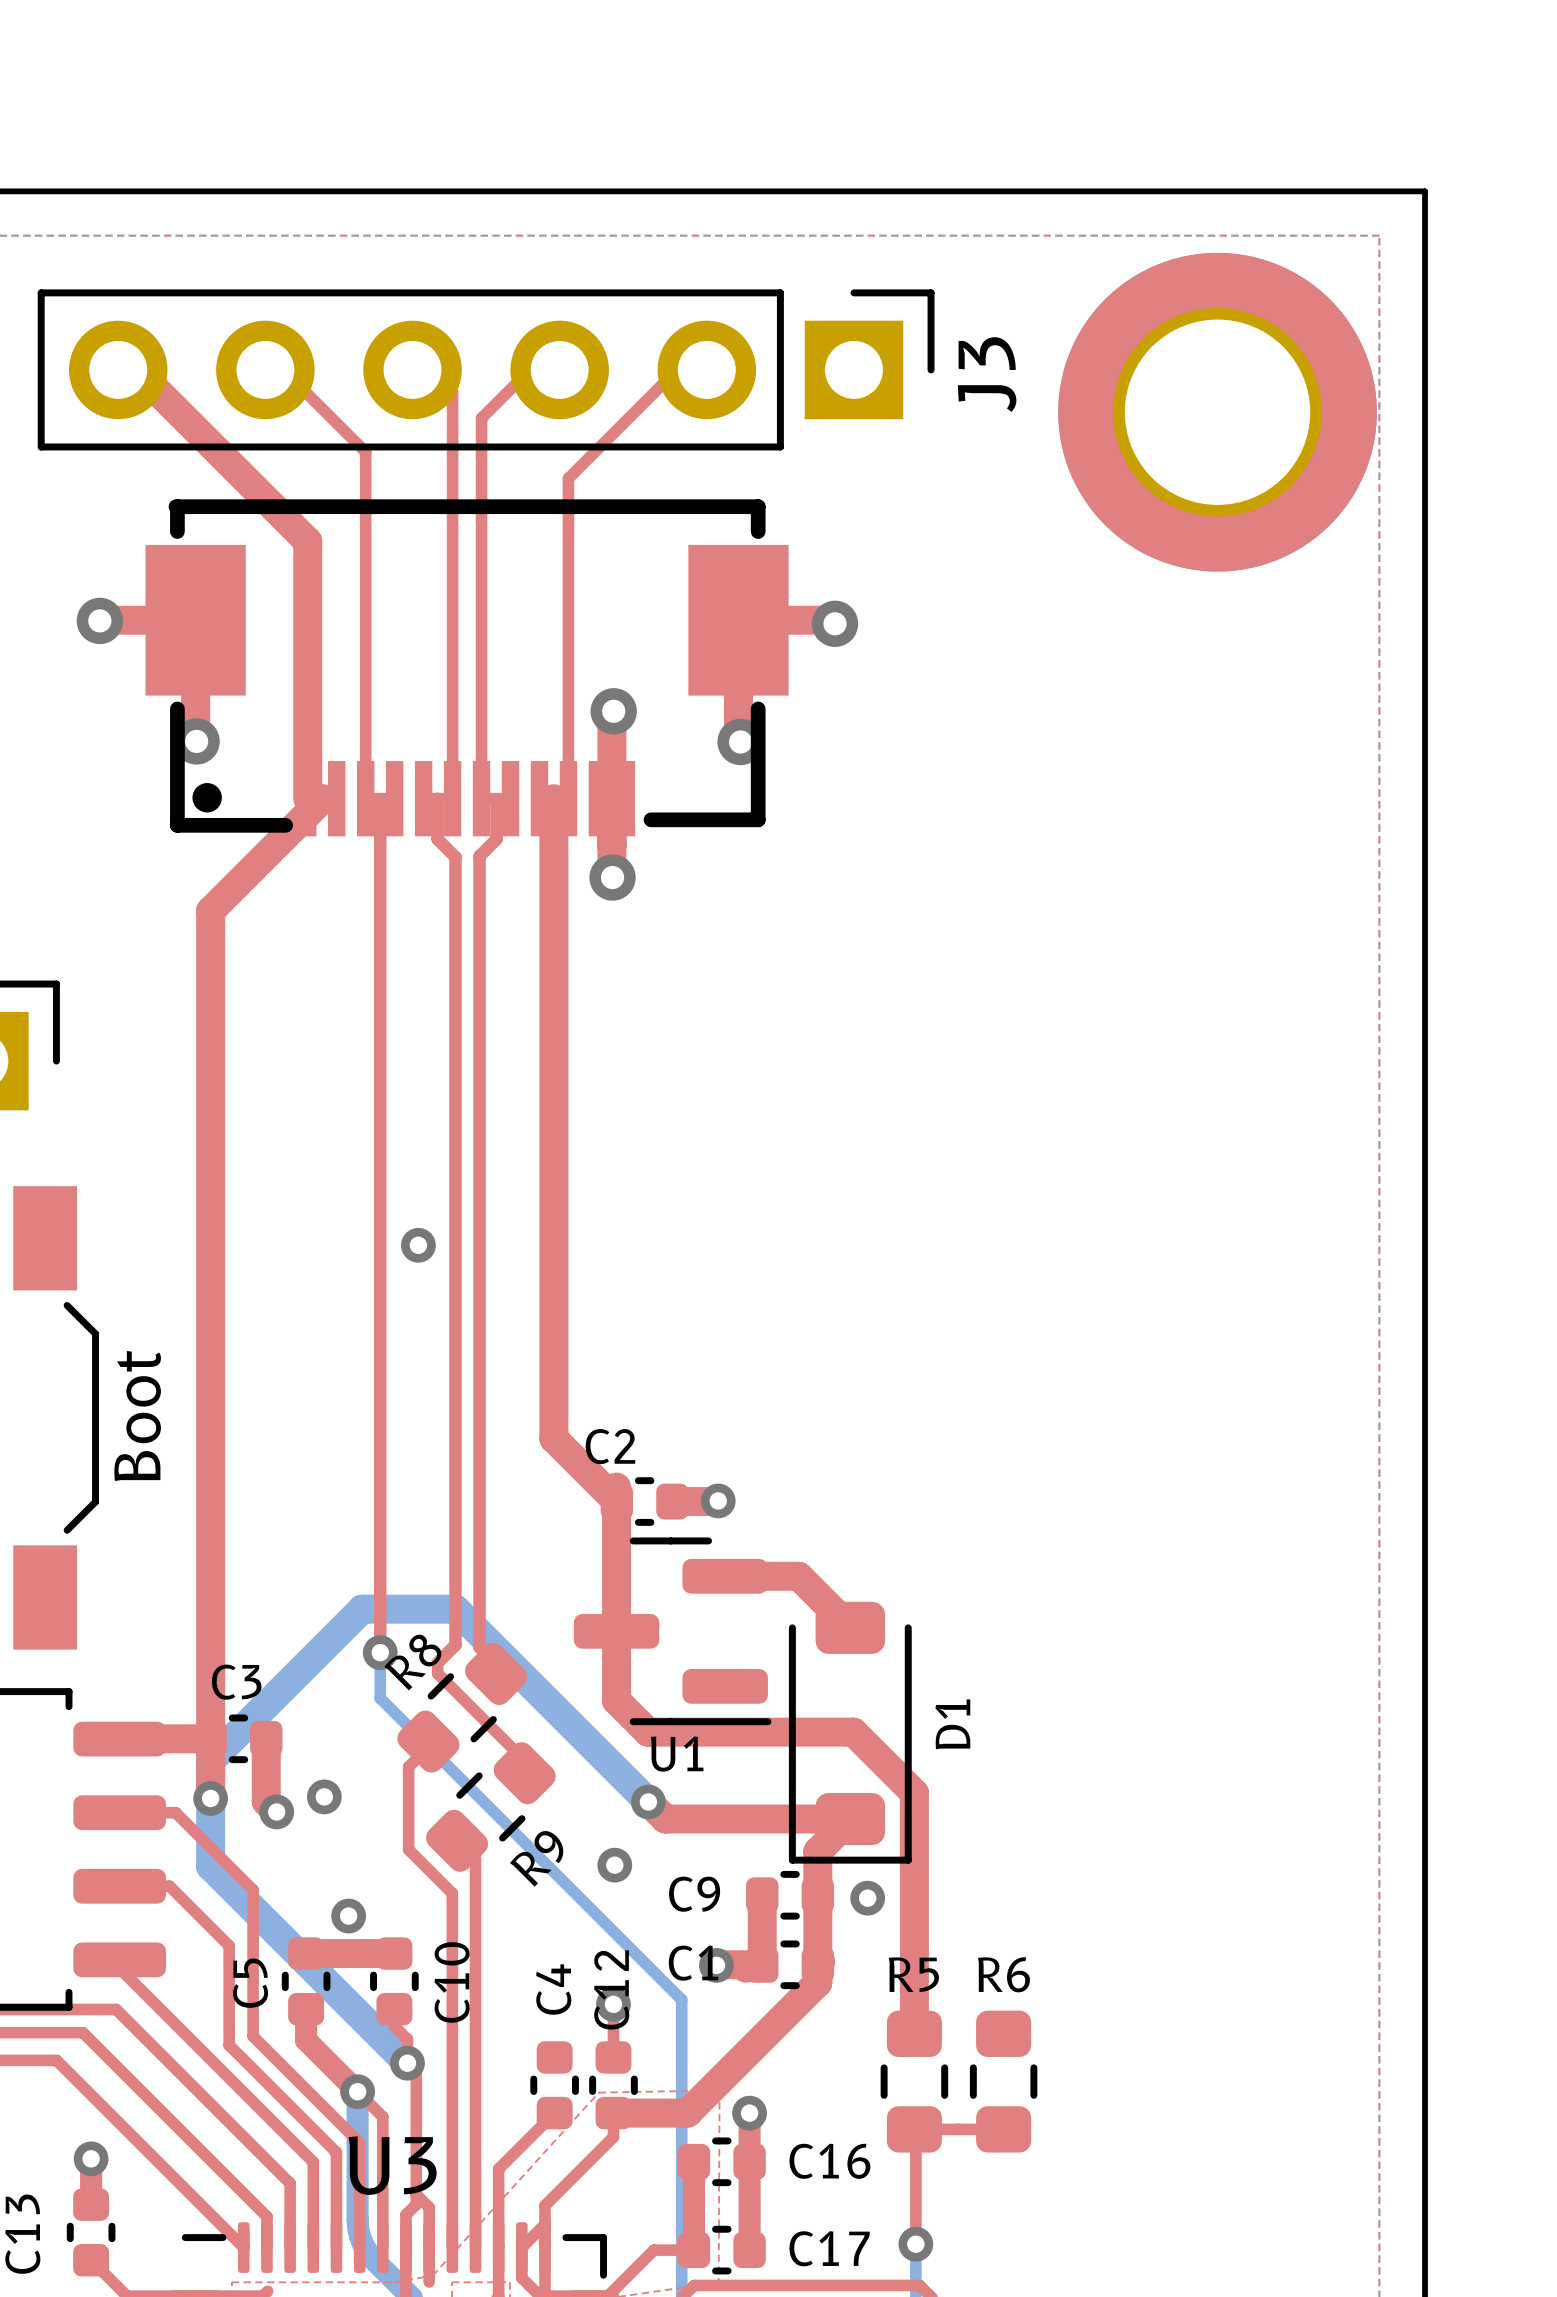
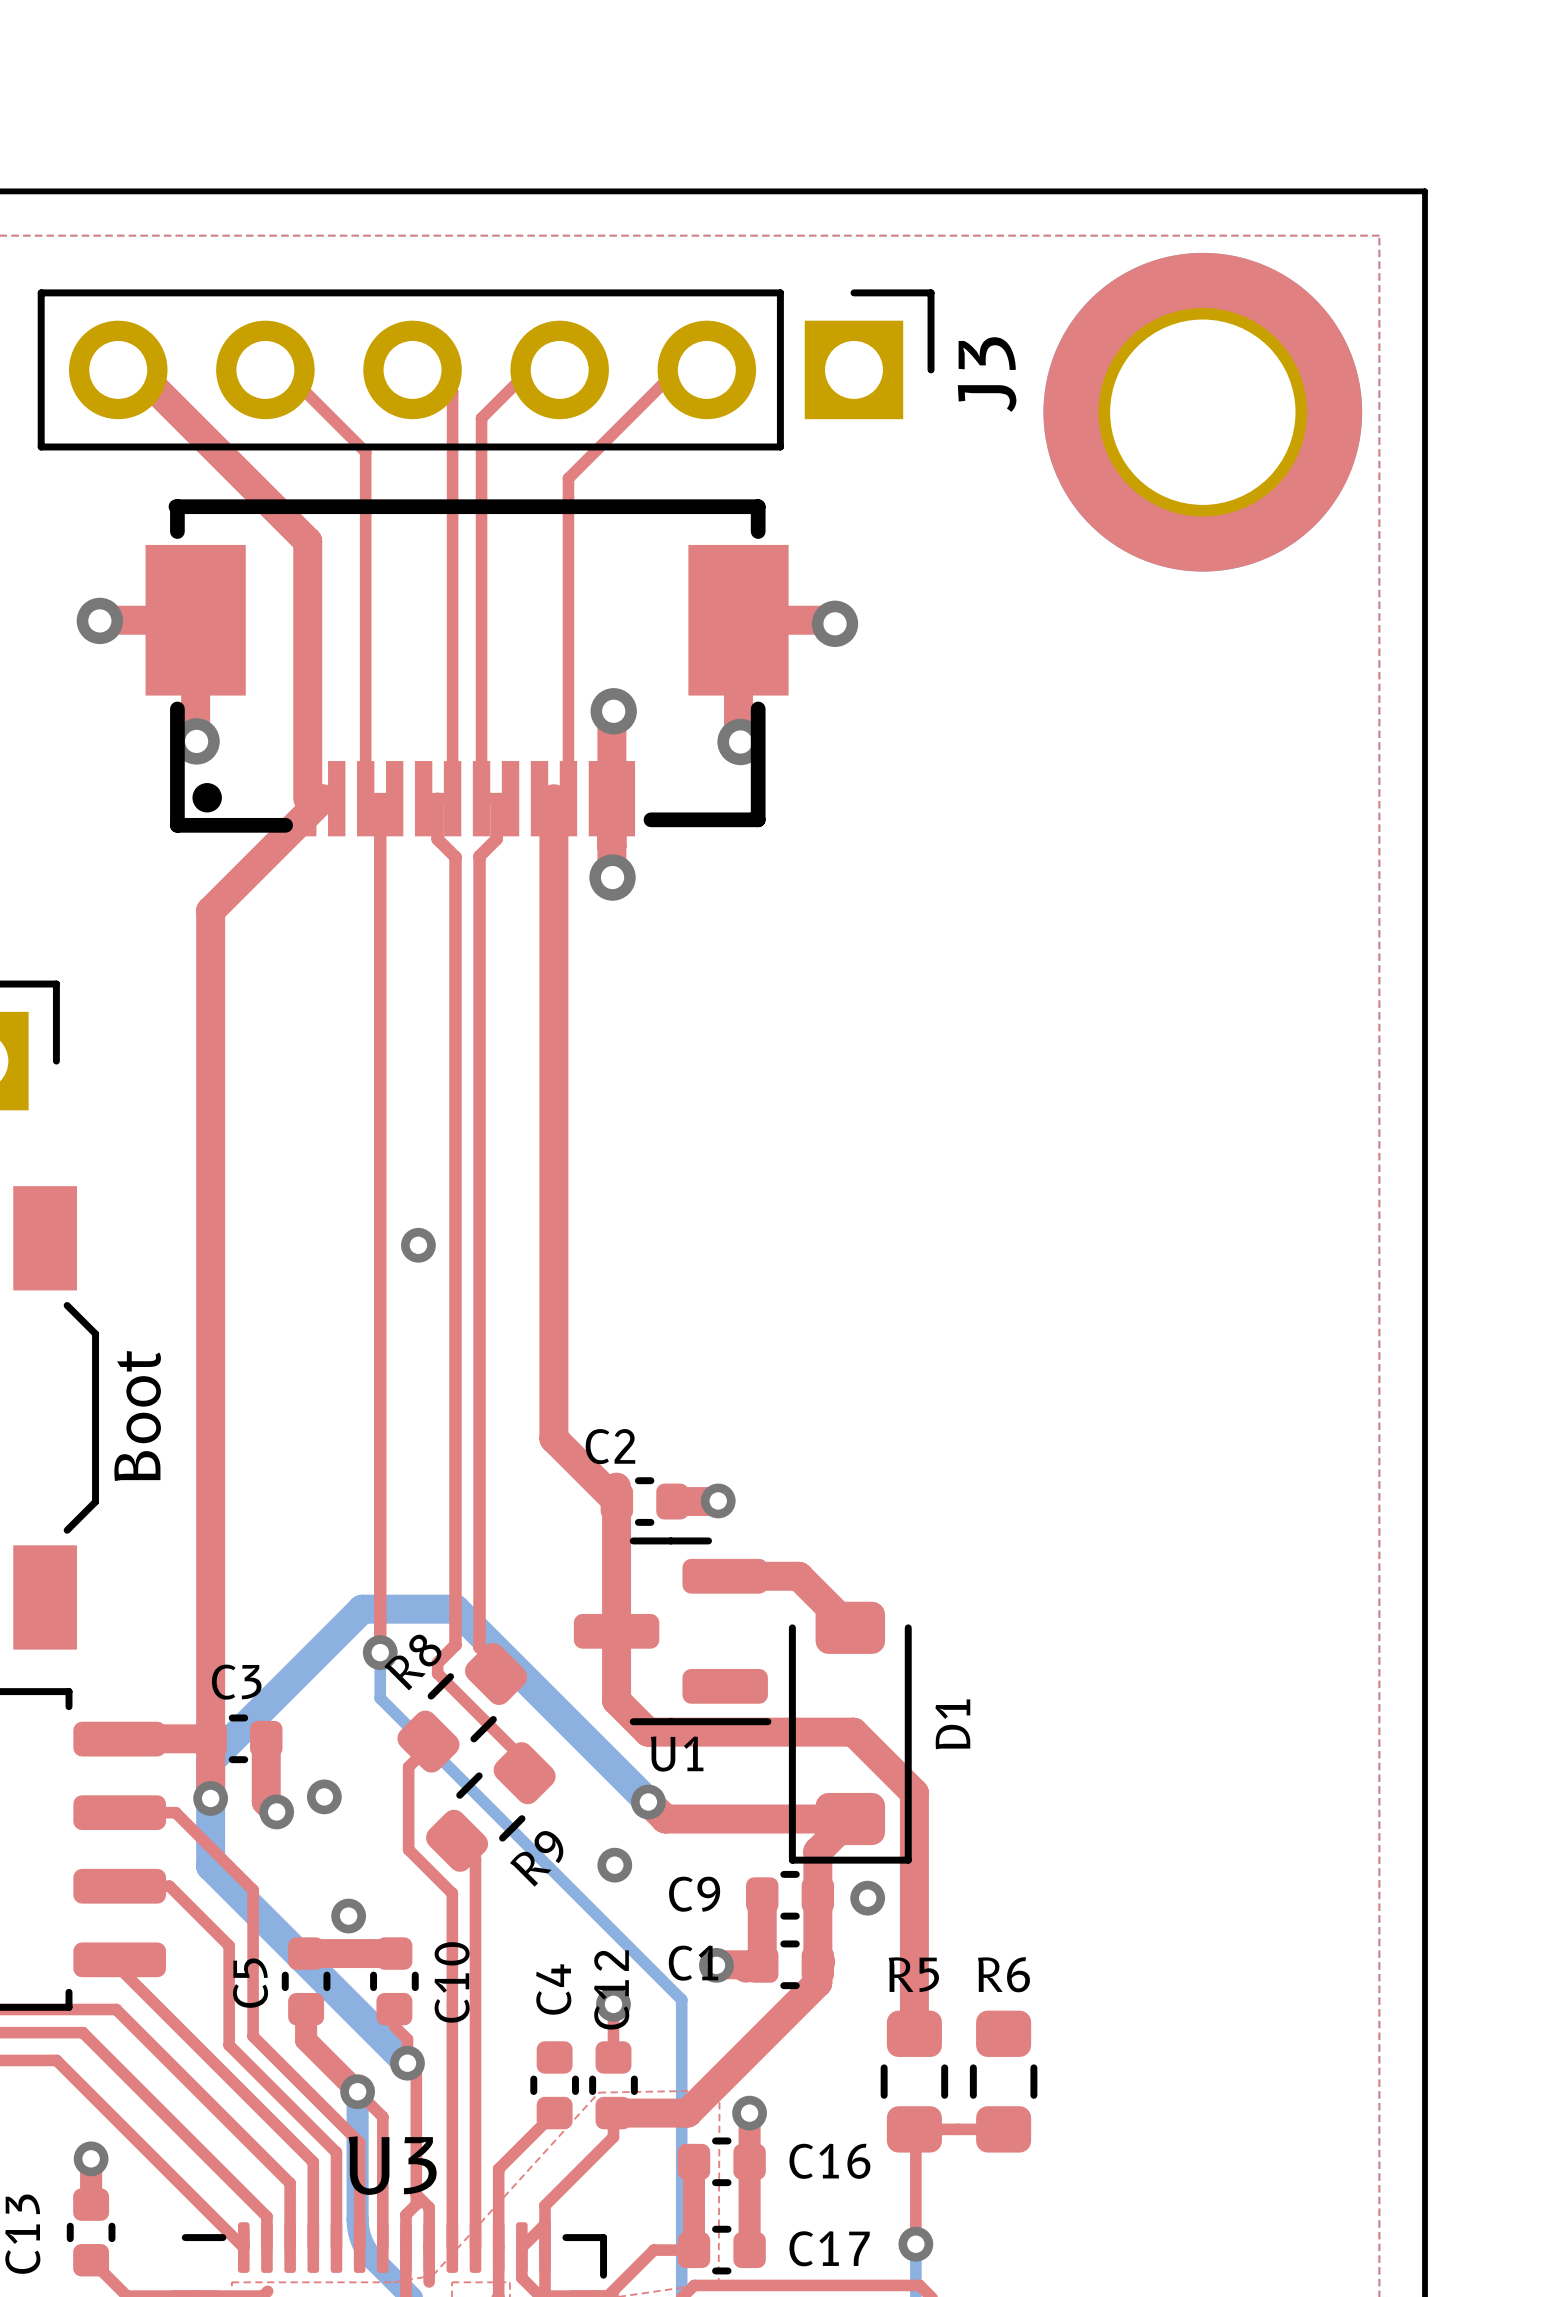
part position: (1217, 412) -> (1202, 412)

